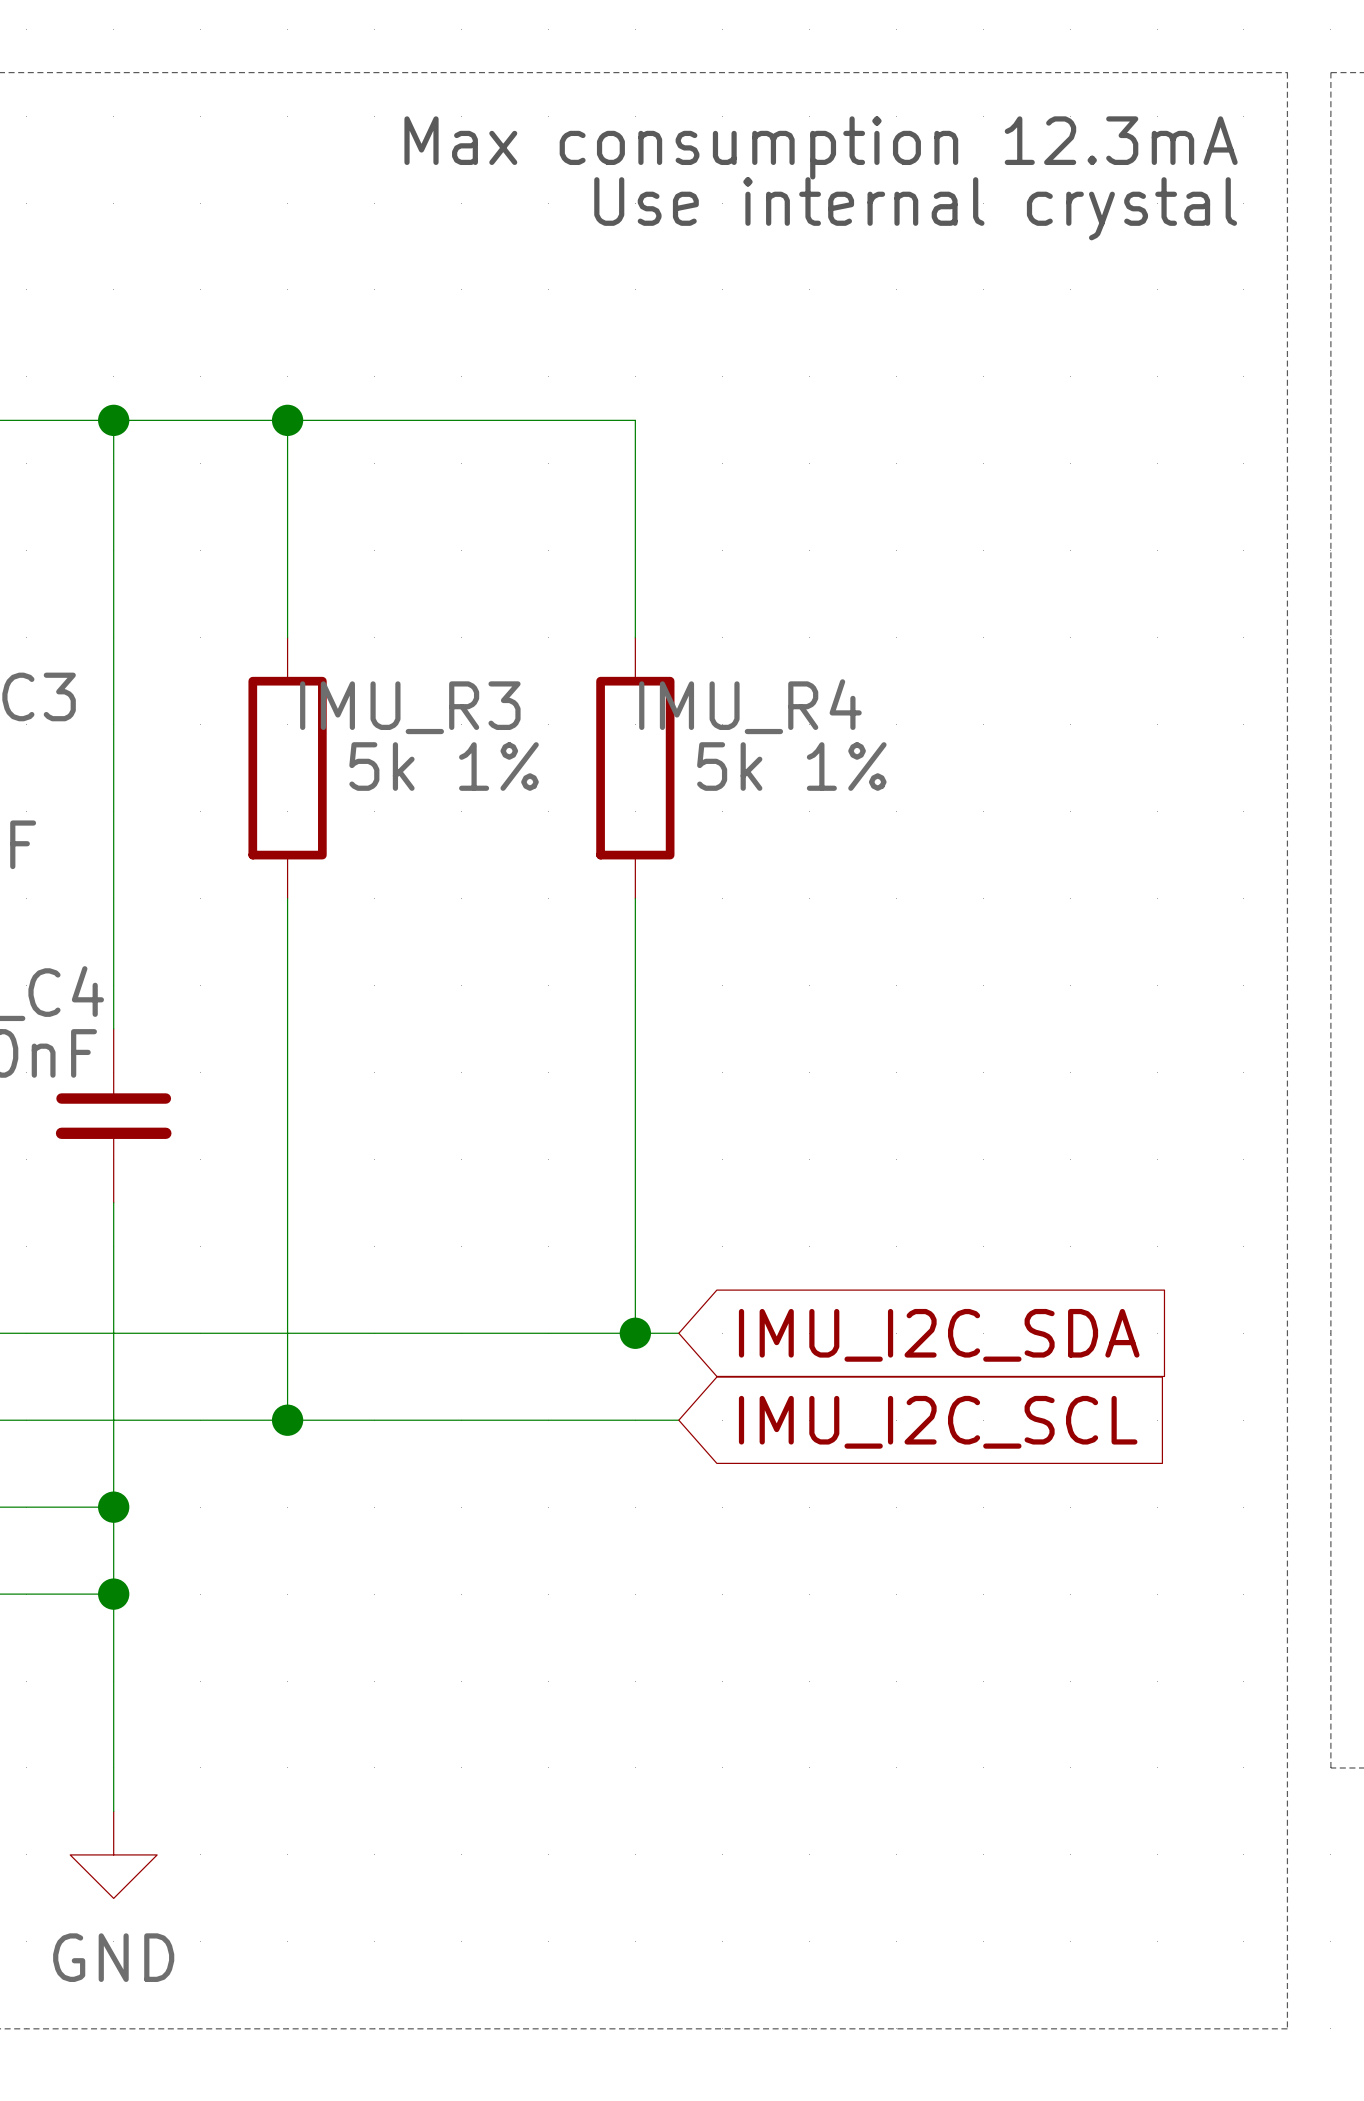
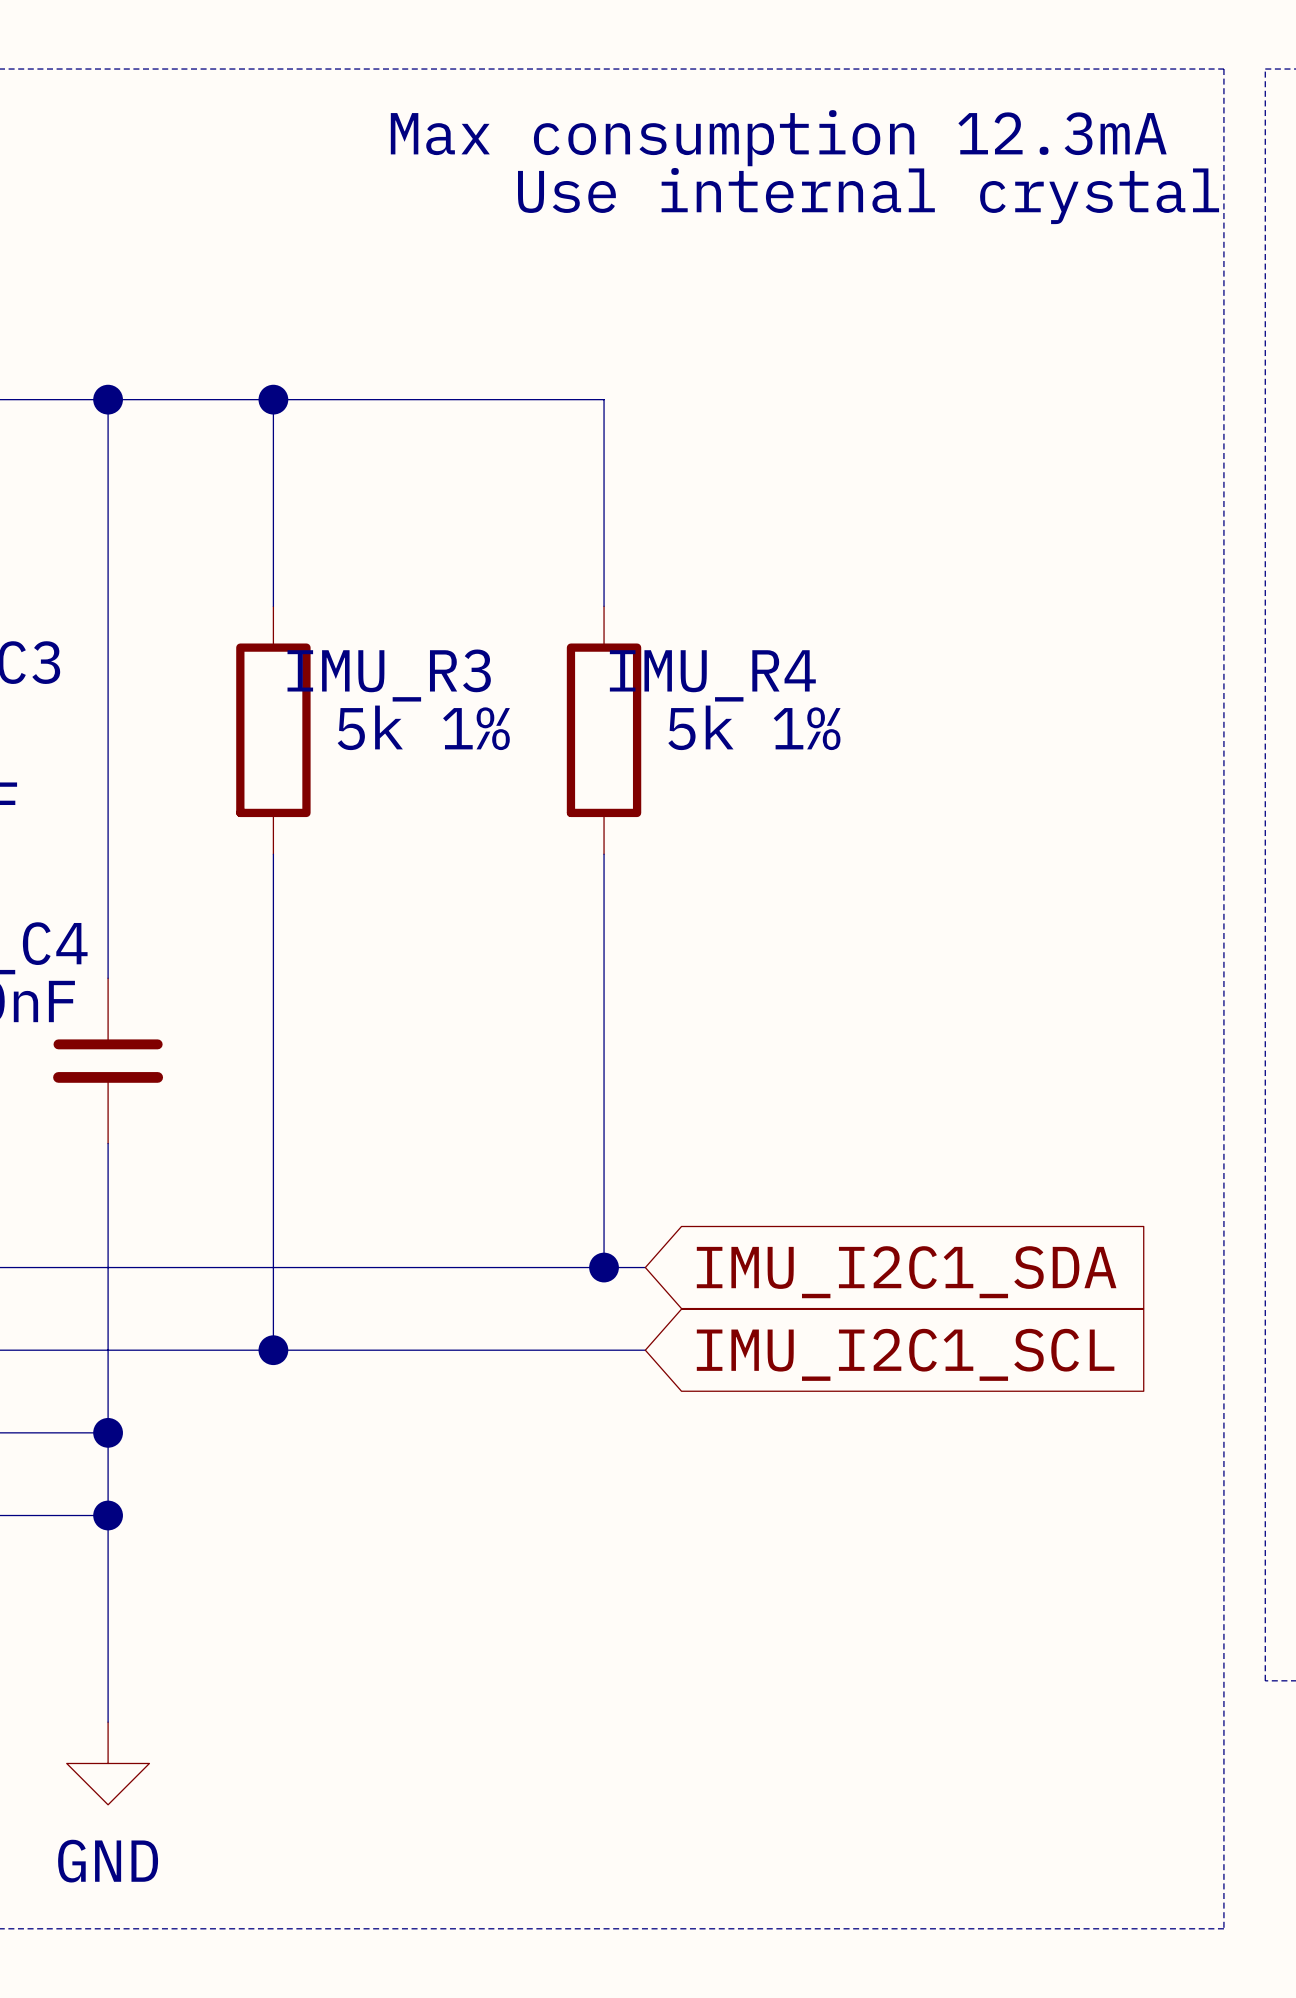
global label: IMU_I2C_SDA (939, 1335) -> IMU_I2C1_SDA (906, 1272)
global label: IMU_I2C_SCL (938, 1422) -> IMU_I2C1_SCL (905, 1354)

